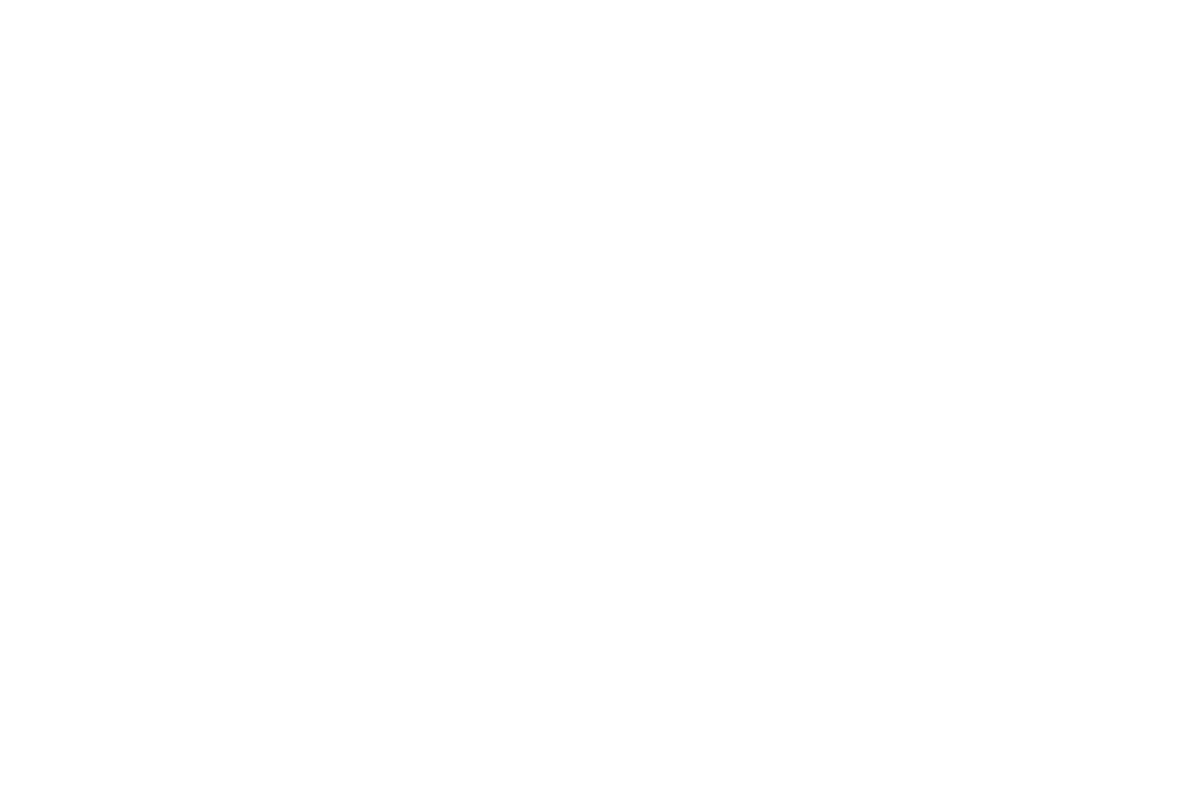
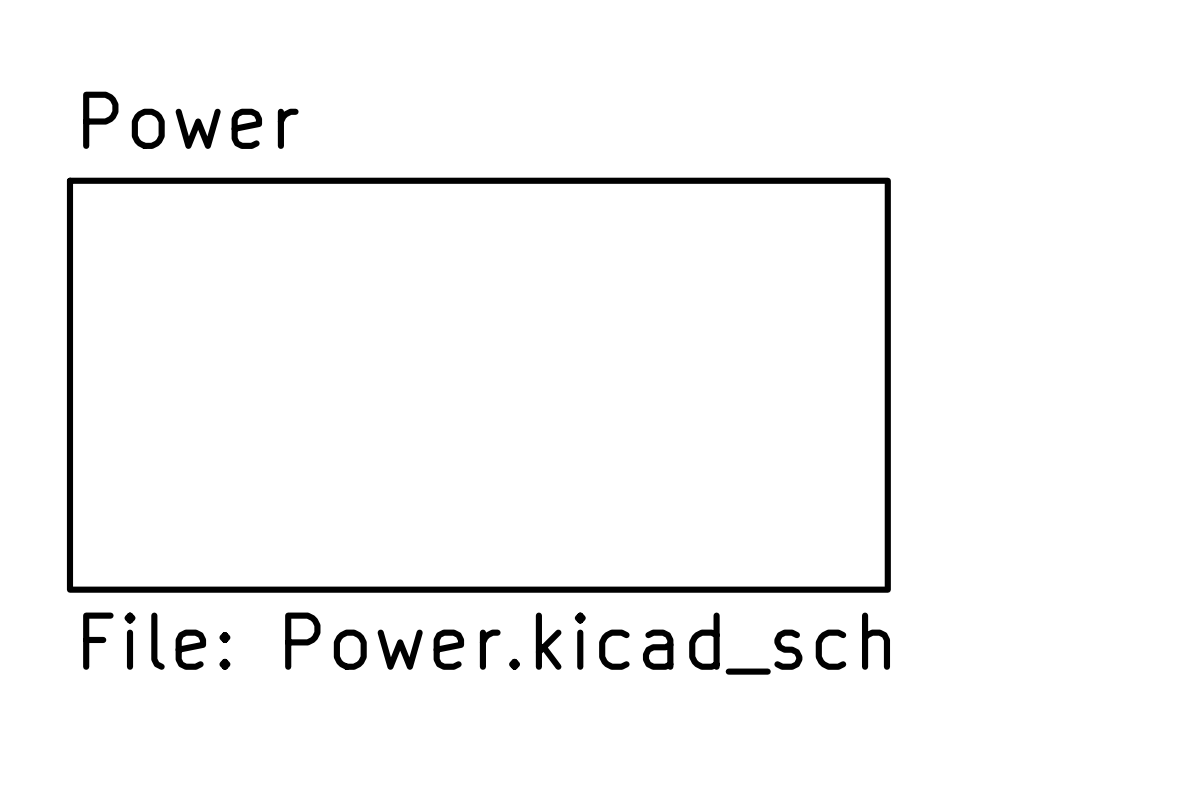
sheet Power: none -> File: Power.kicad_sch (478, 385)

